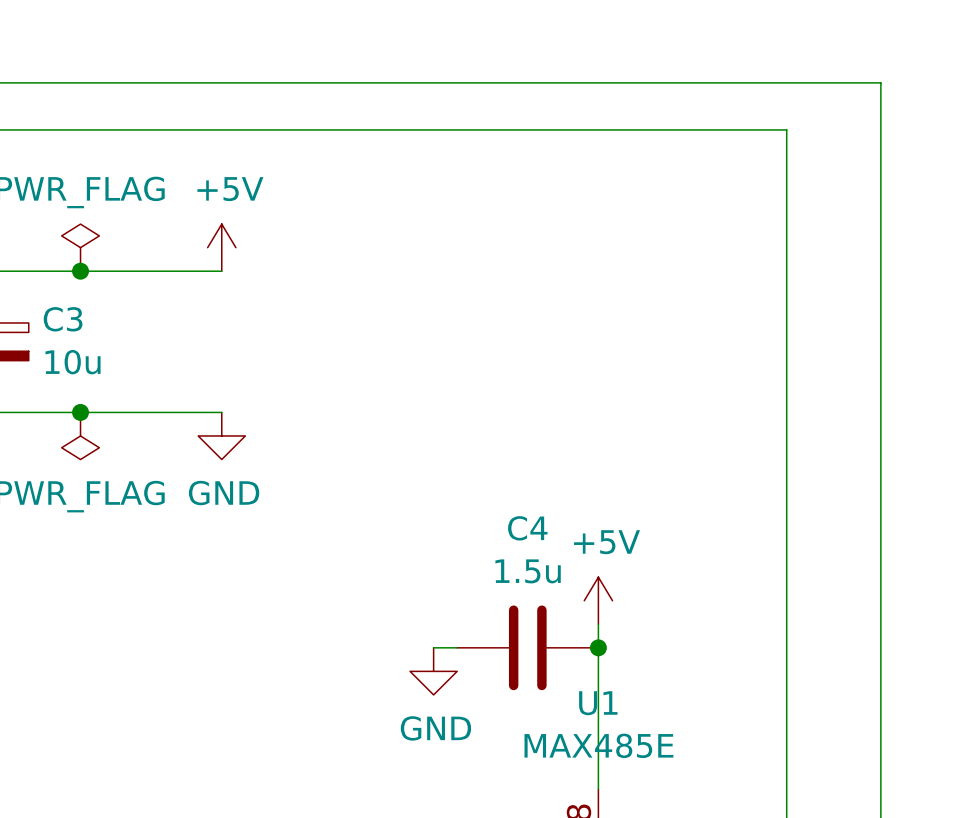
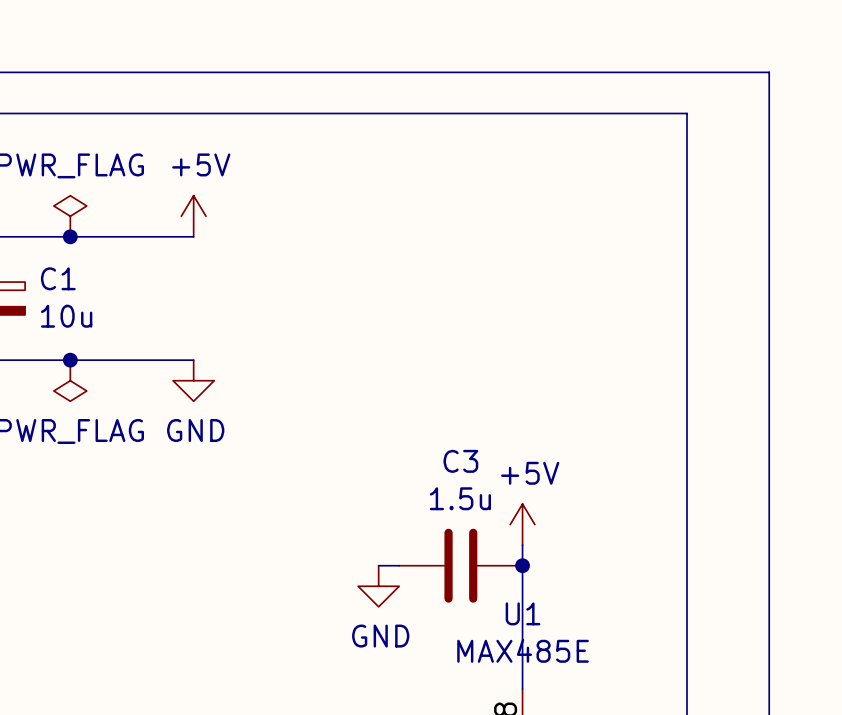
C3 name: C3 (63, 319) -> C1 (58, 278)
C4 name: C4 (527, 528) -> C3 (460, 461)

